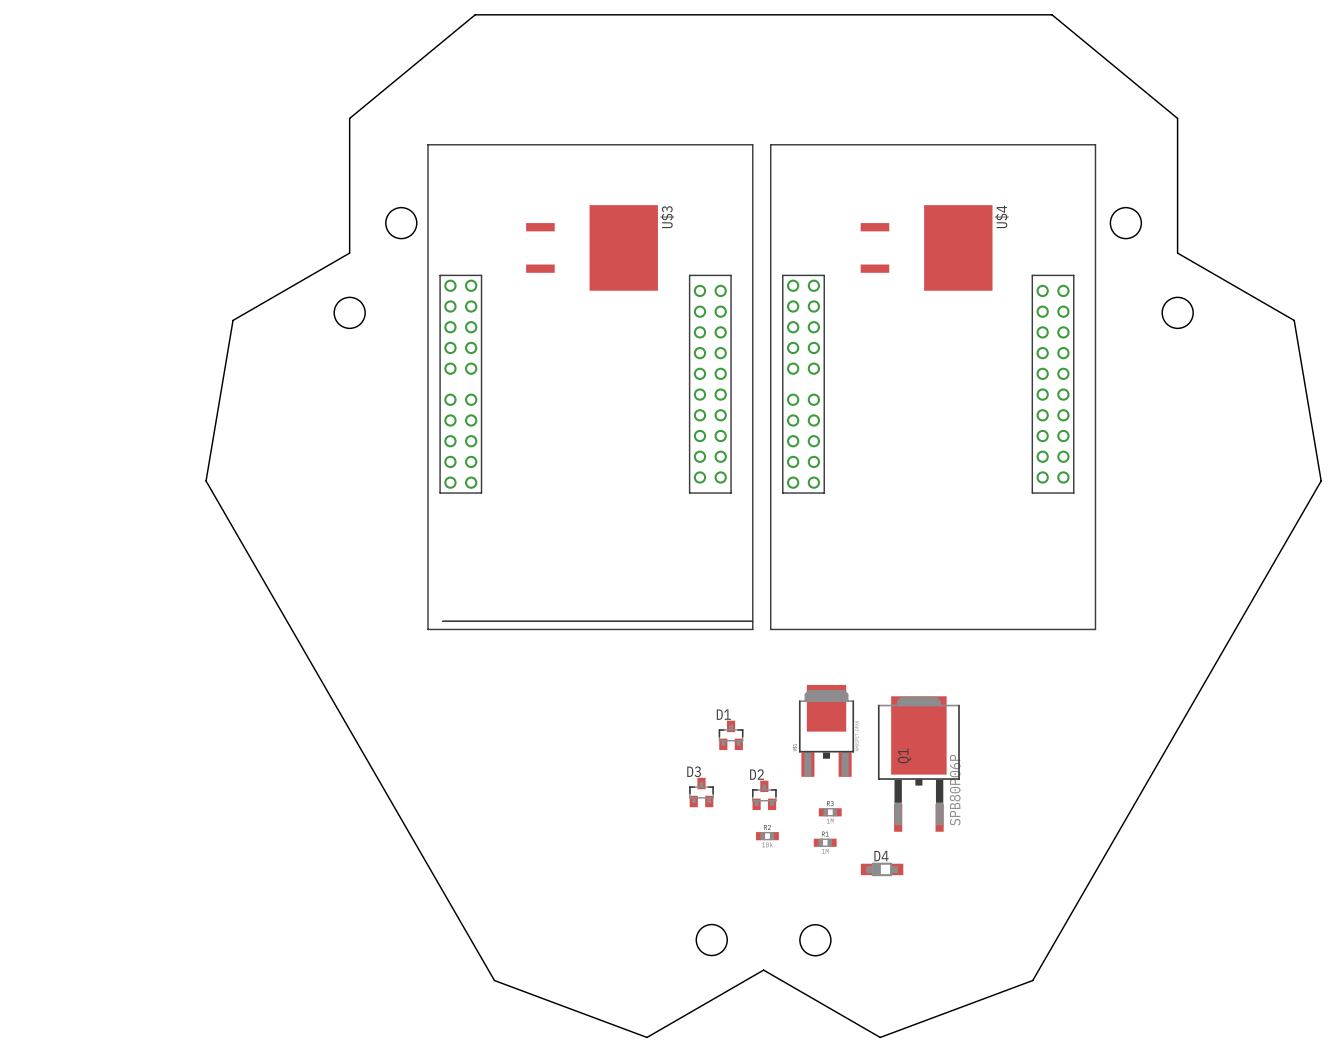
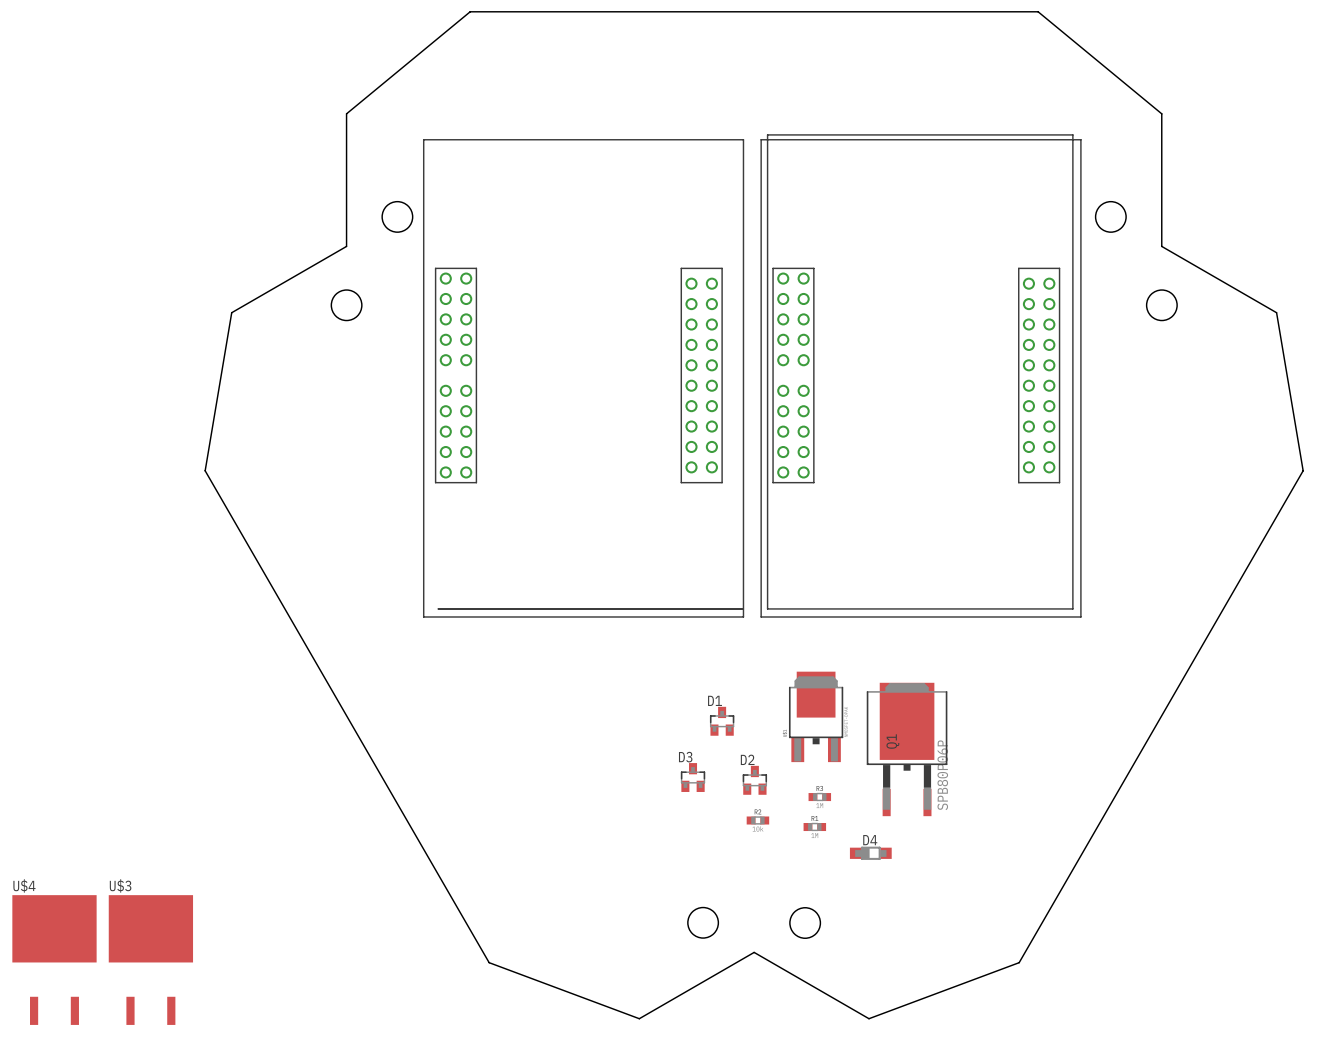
line: none -> (767, 134) (767, 608) (1072, 608) (1072, 134) (767, 134)
U$3 rotation: 0° (592, 247) -> 90° counterclockwise (150, 960)
U$3 position: (592, 247) -> (150, 960)
U$4 rotation: 0° (926, 247) -> 90° counterclockwise (54, 960)
U$4 position: (926, 247) -> (54, 960)

